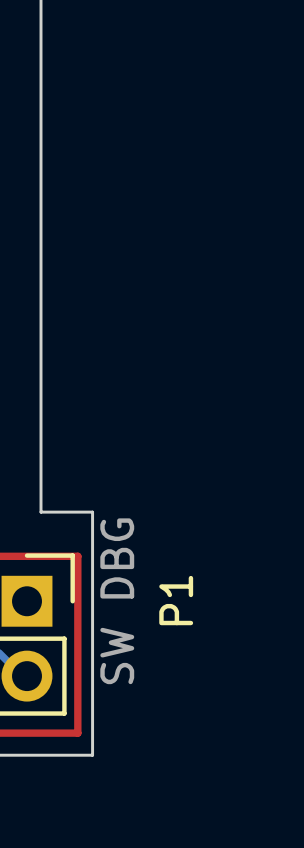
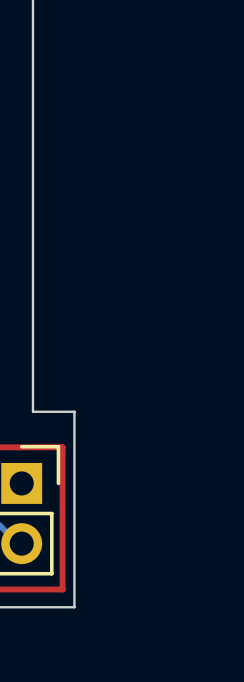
P1 name: P1 (176, 600) -> none
P1 value: SW DBG (117, 601) -> none

